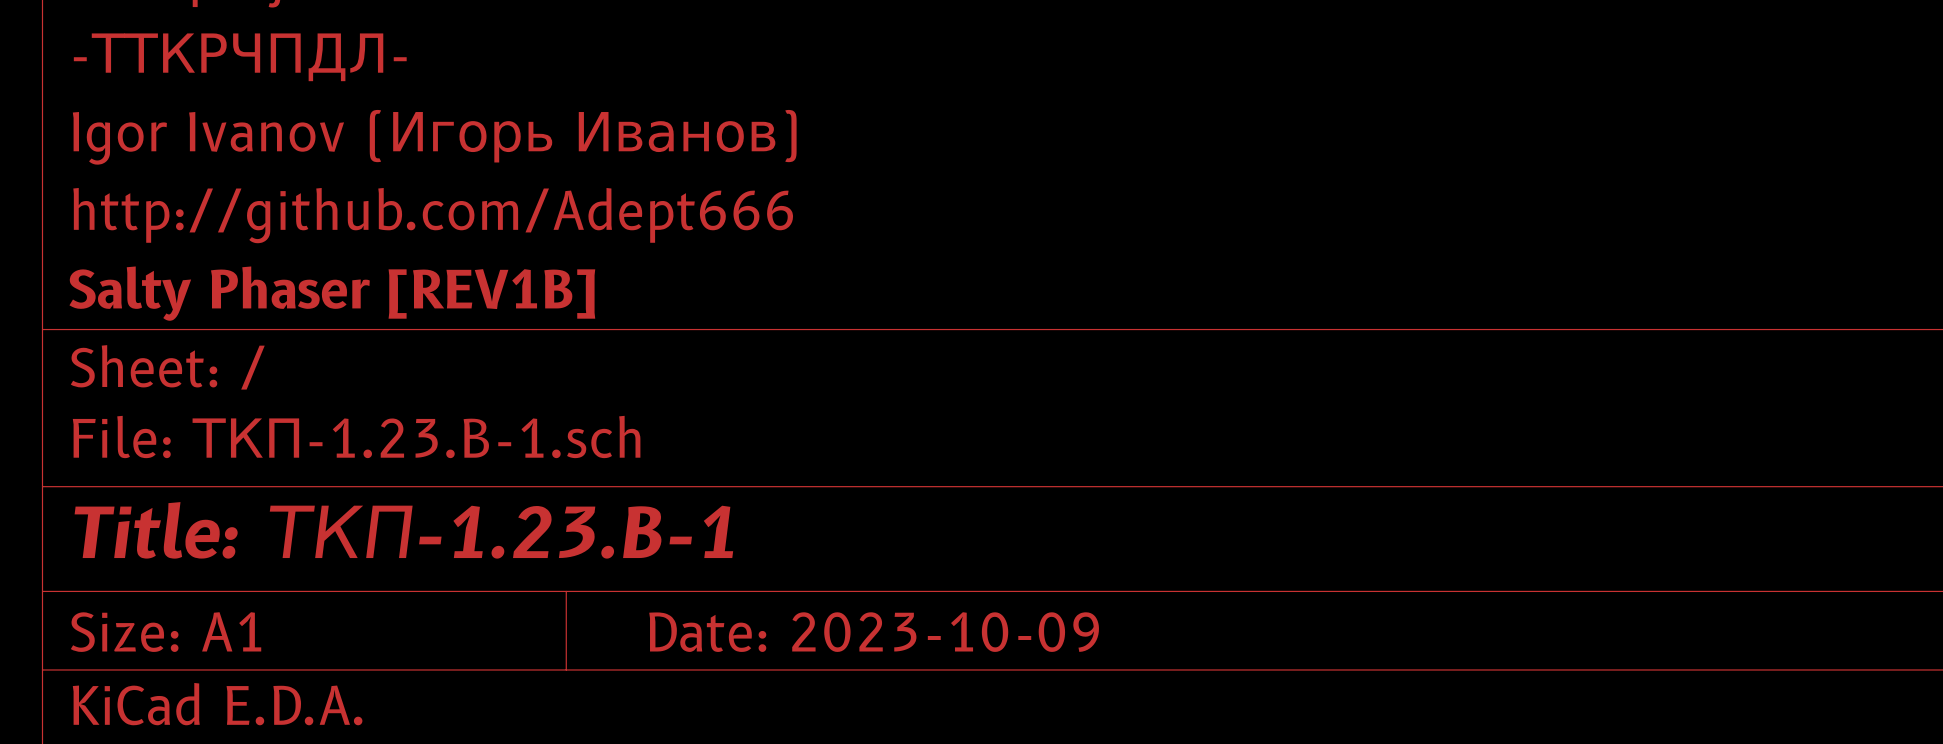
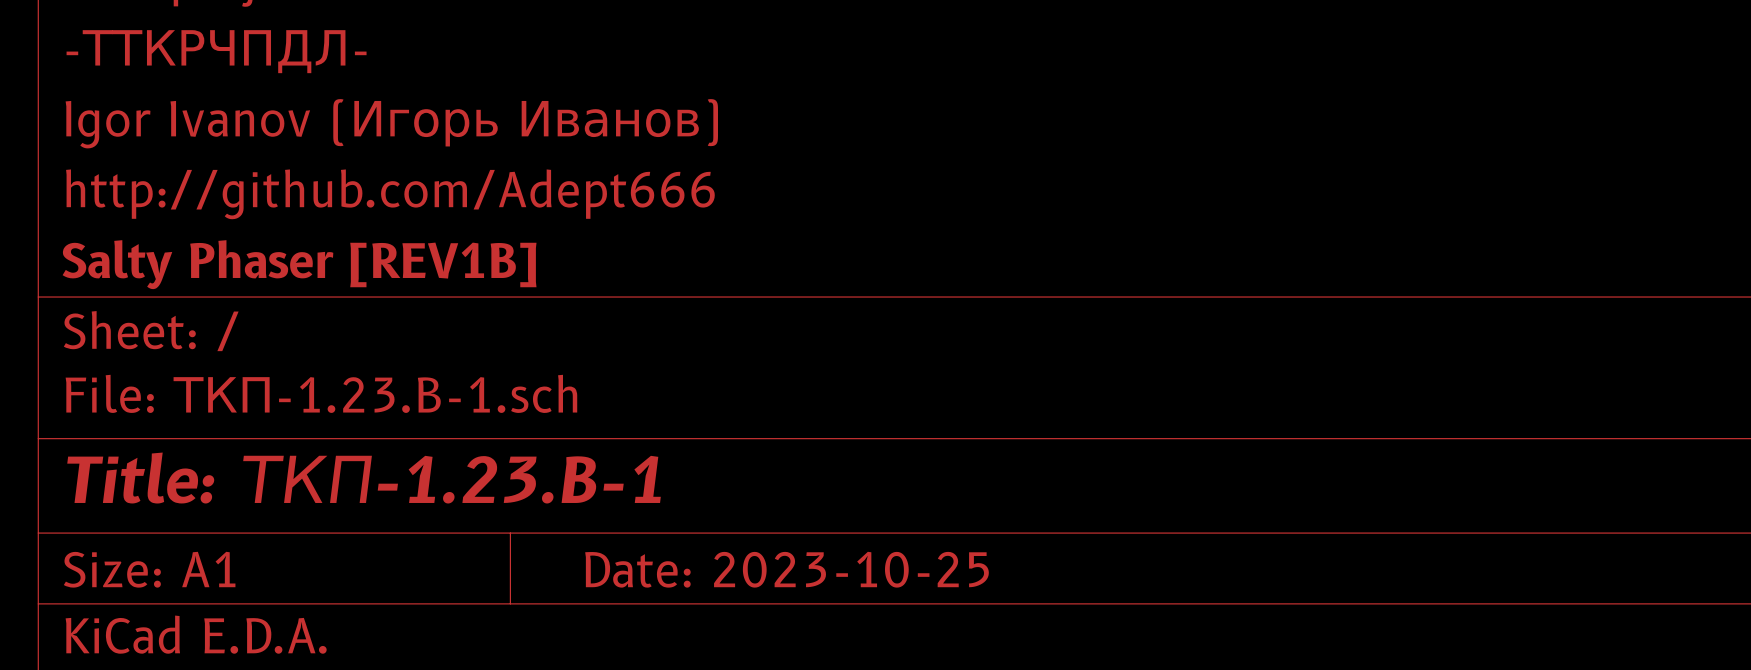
title block: Date: 2023-10-09 (874, 632) -> Date: 2023-10-25 (787, 569)

